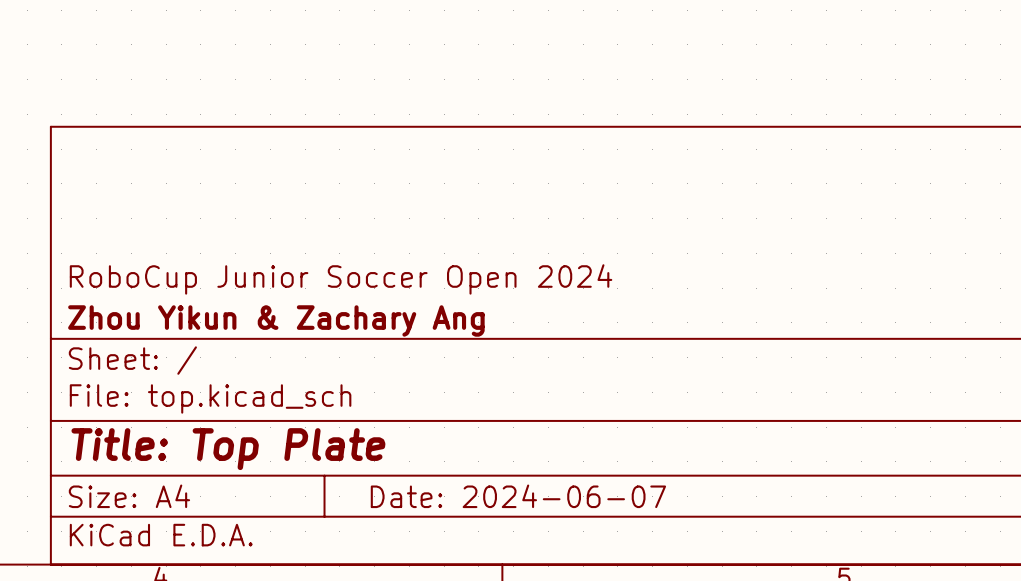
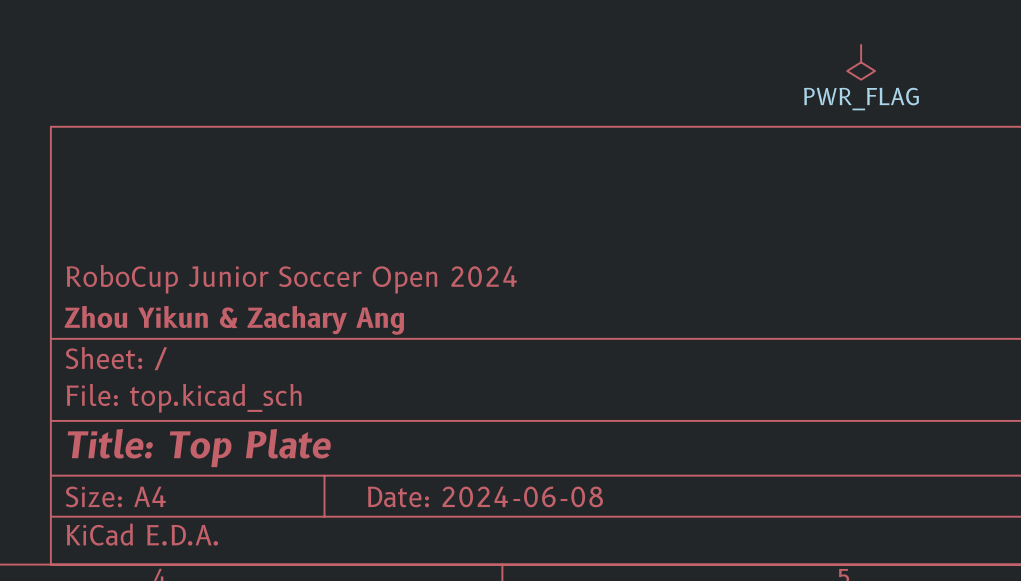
power symbol: none -> PWR_FLAG (861, 62)
title block: Date: 2024-06-07 (518, 496) -> Date: 2024-06-08 (485, 496)

